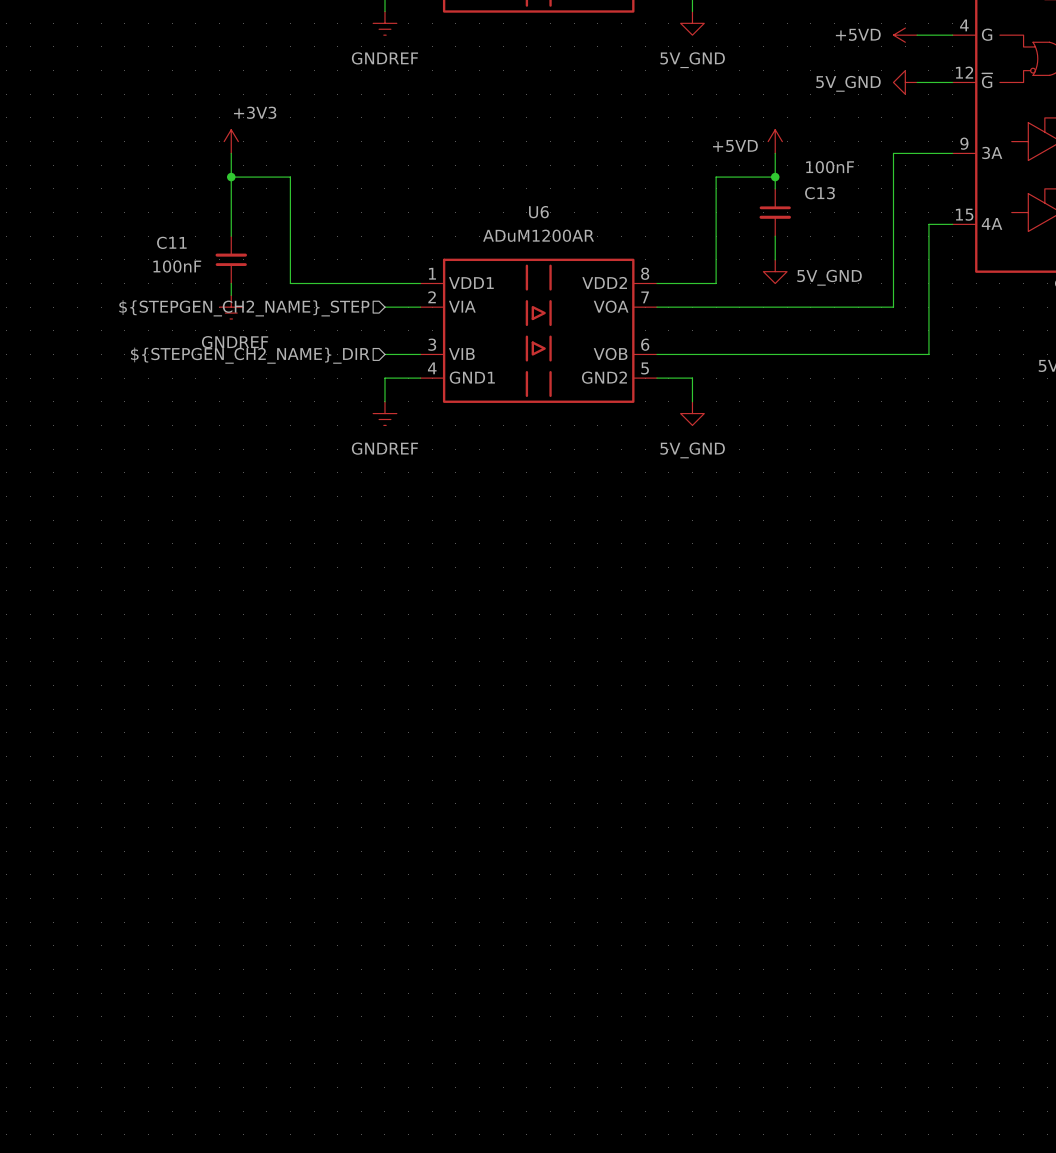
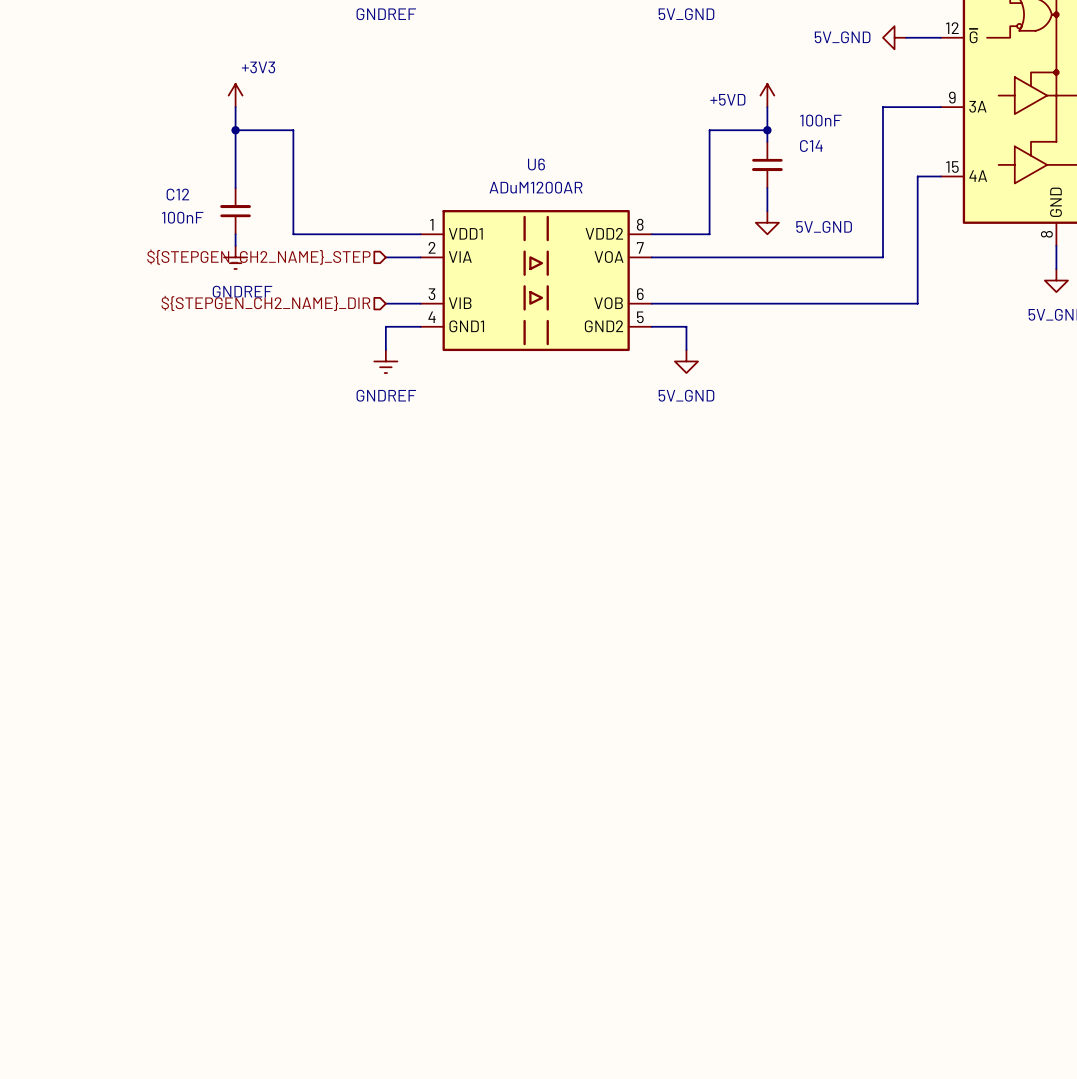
C13 name: C13 (819, 193) -> C14 (811, 146)
C11 name: C11 (171, 242) -> C12 (177, 194)

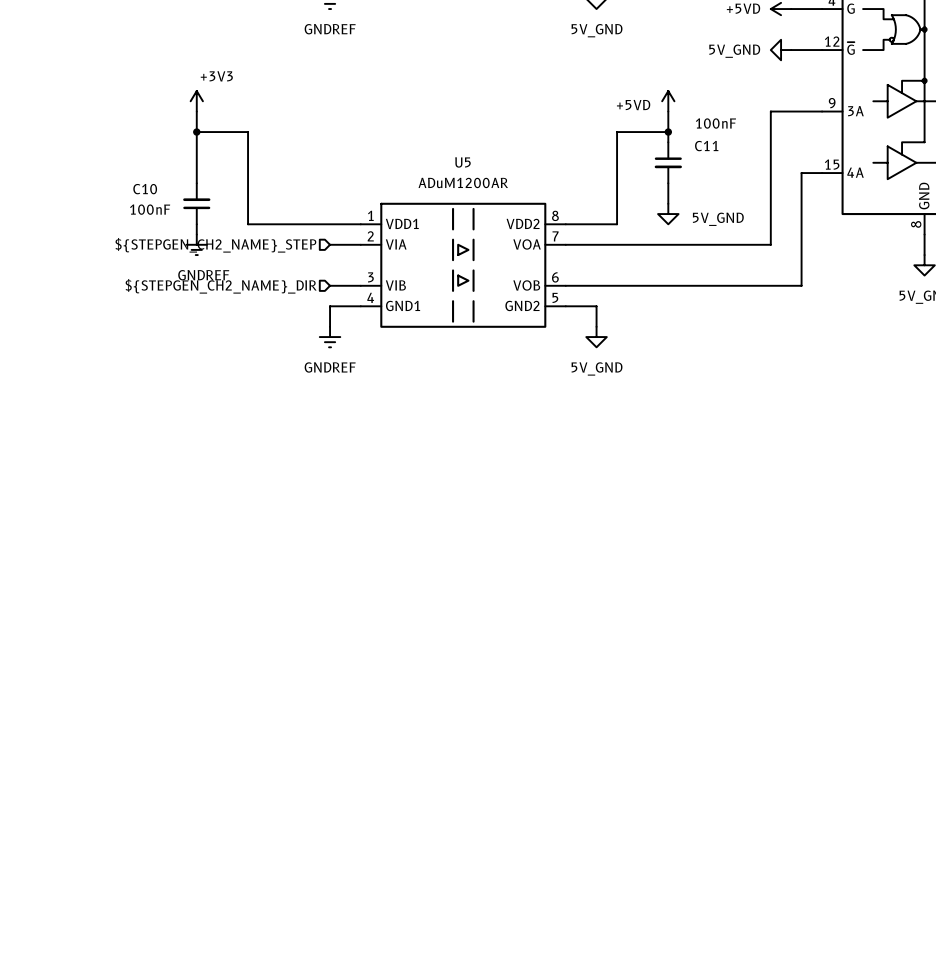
C14 name: C14 (811, 146) -> C11 (706, 146)
U6 name: U6 (536, 164) -> U5 (462, 162)
C12 name: C12 (177, 194) -> C10 (145, 189)

